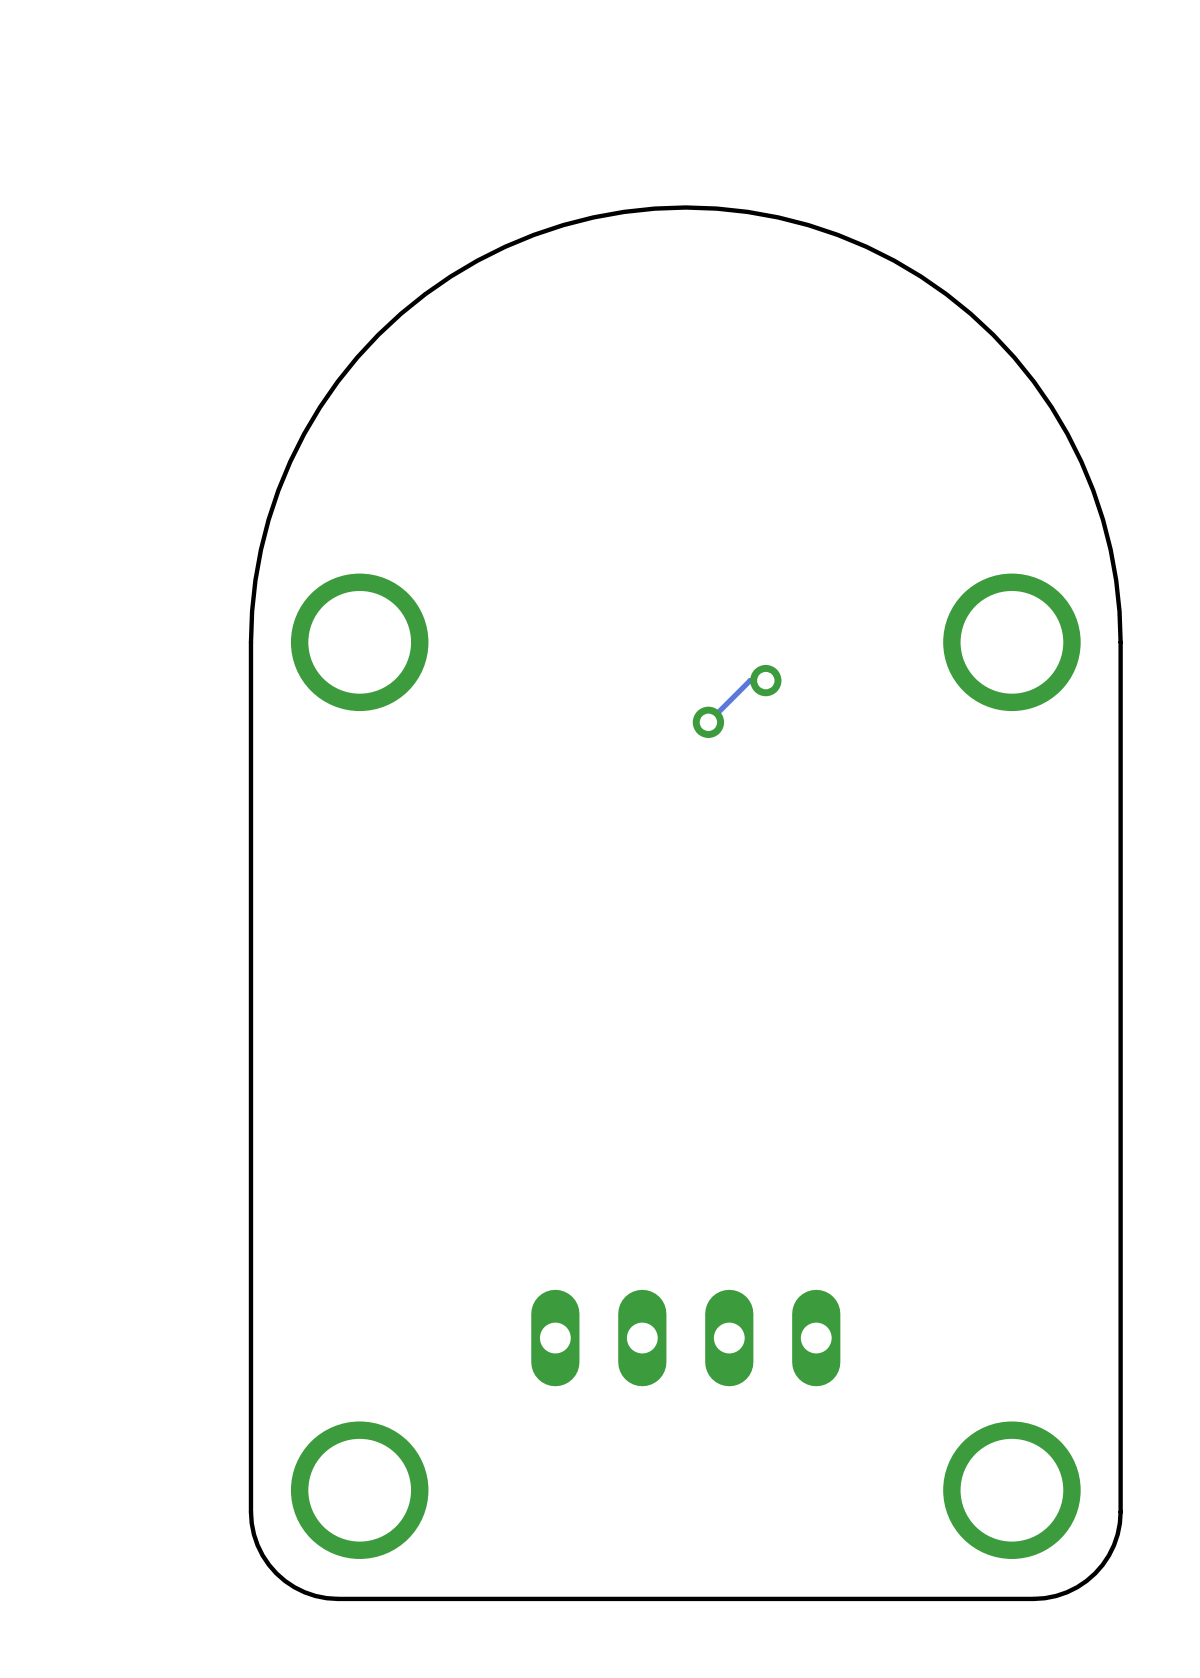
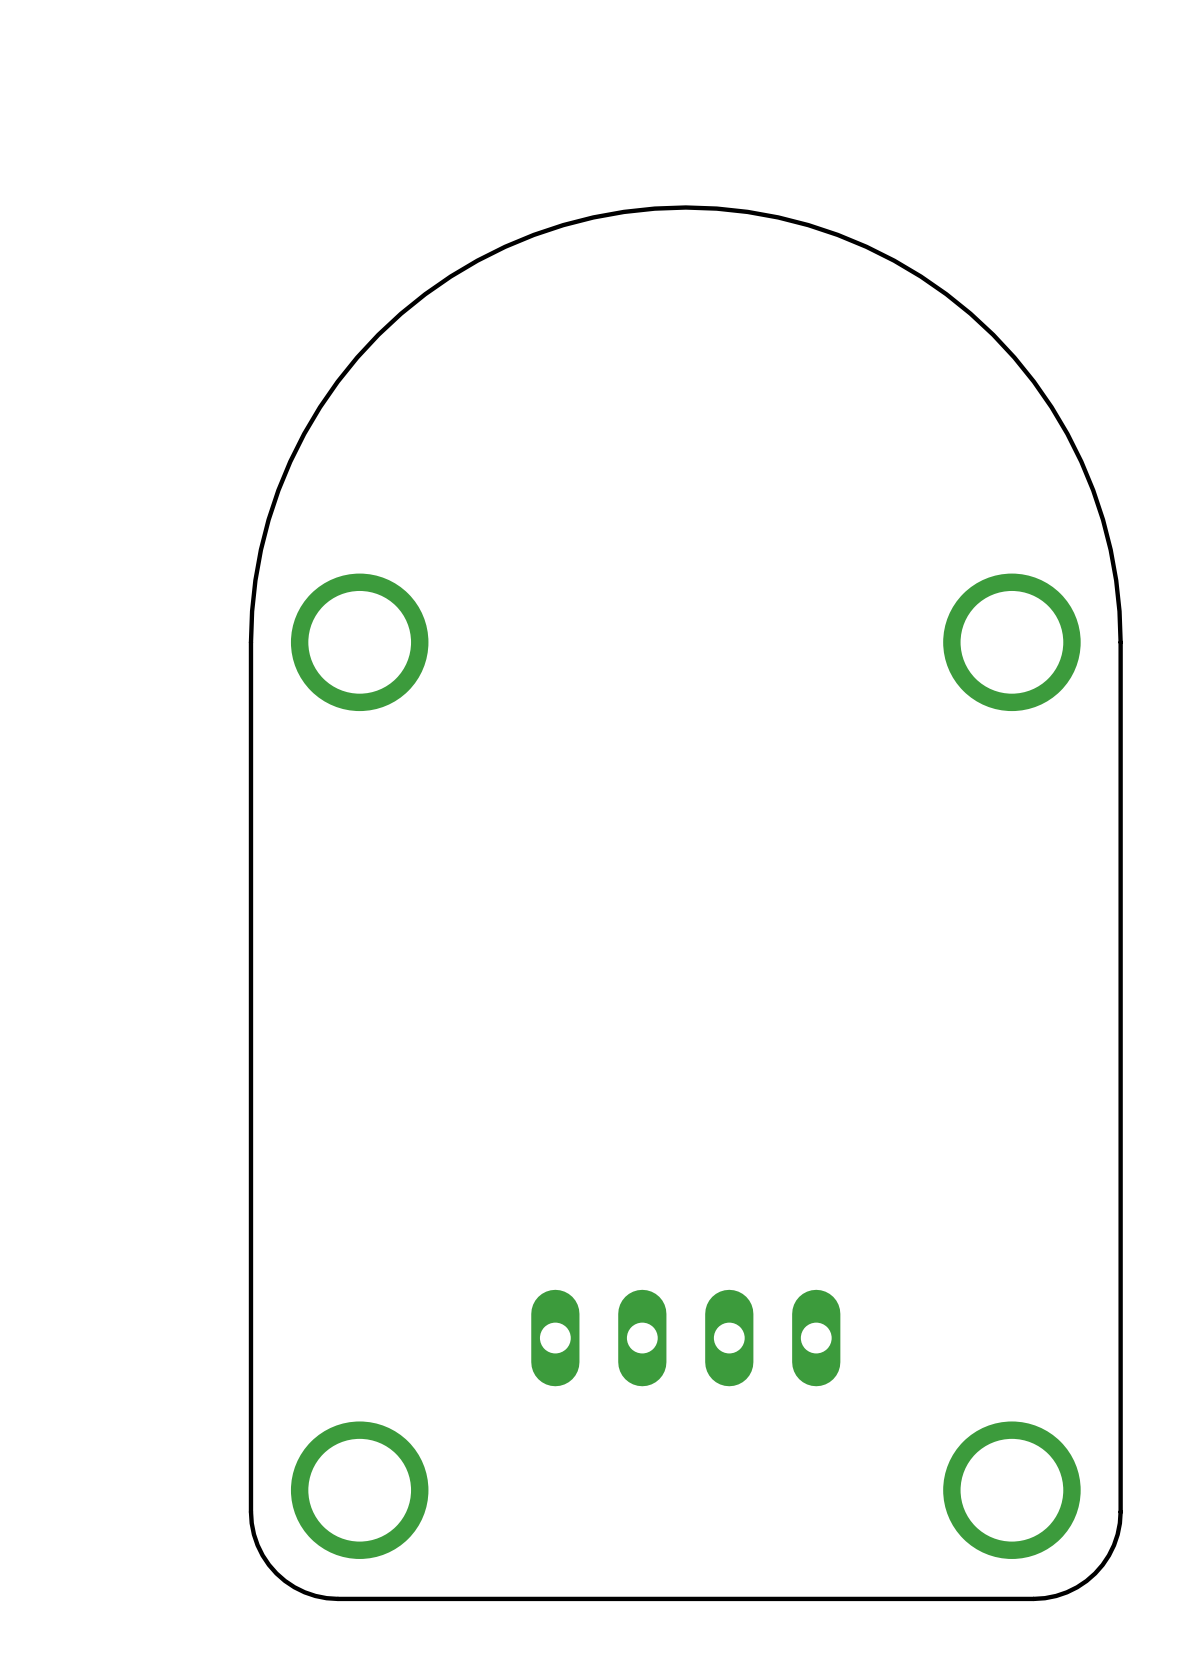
track: (765, 680) (750, 680) (708, 722) -> none
via: (765, 680) -> none
via: (708, 722) -> none

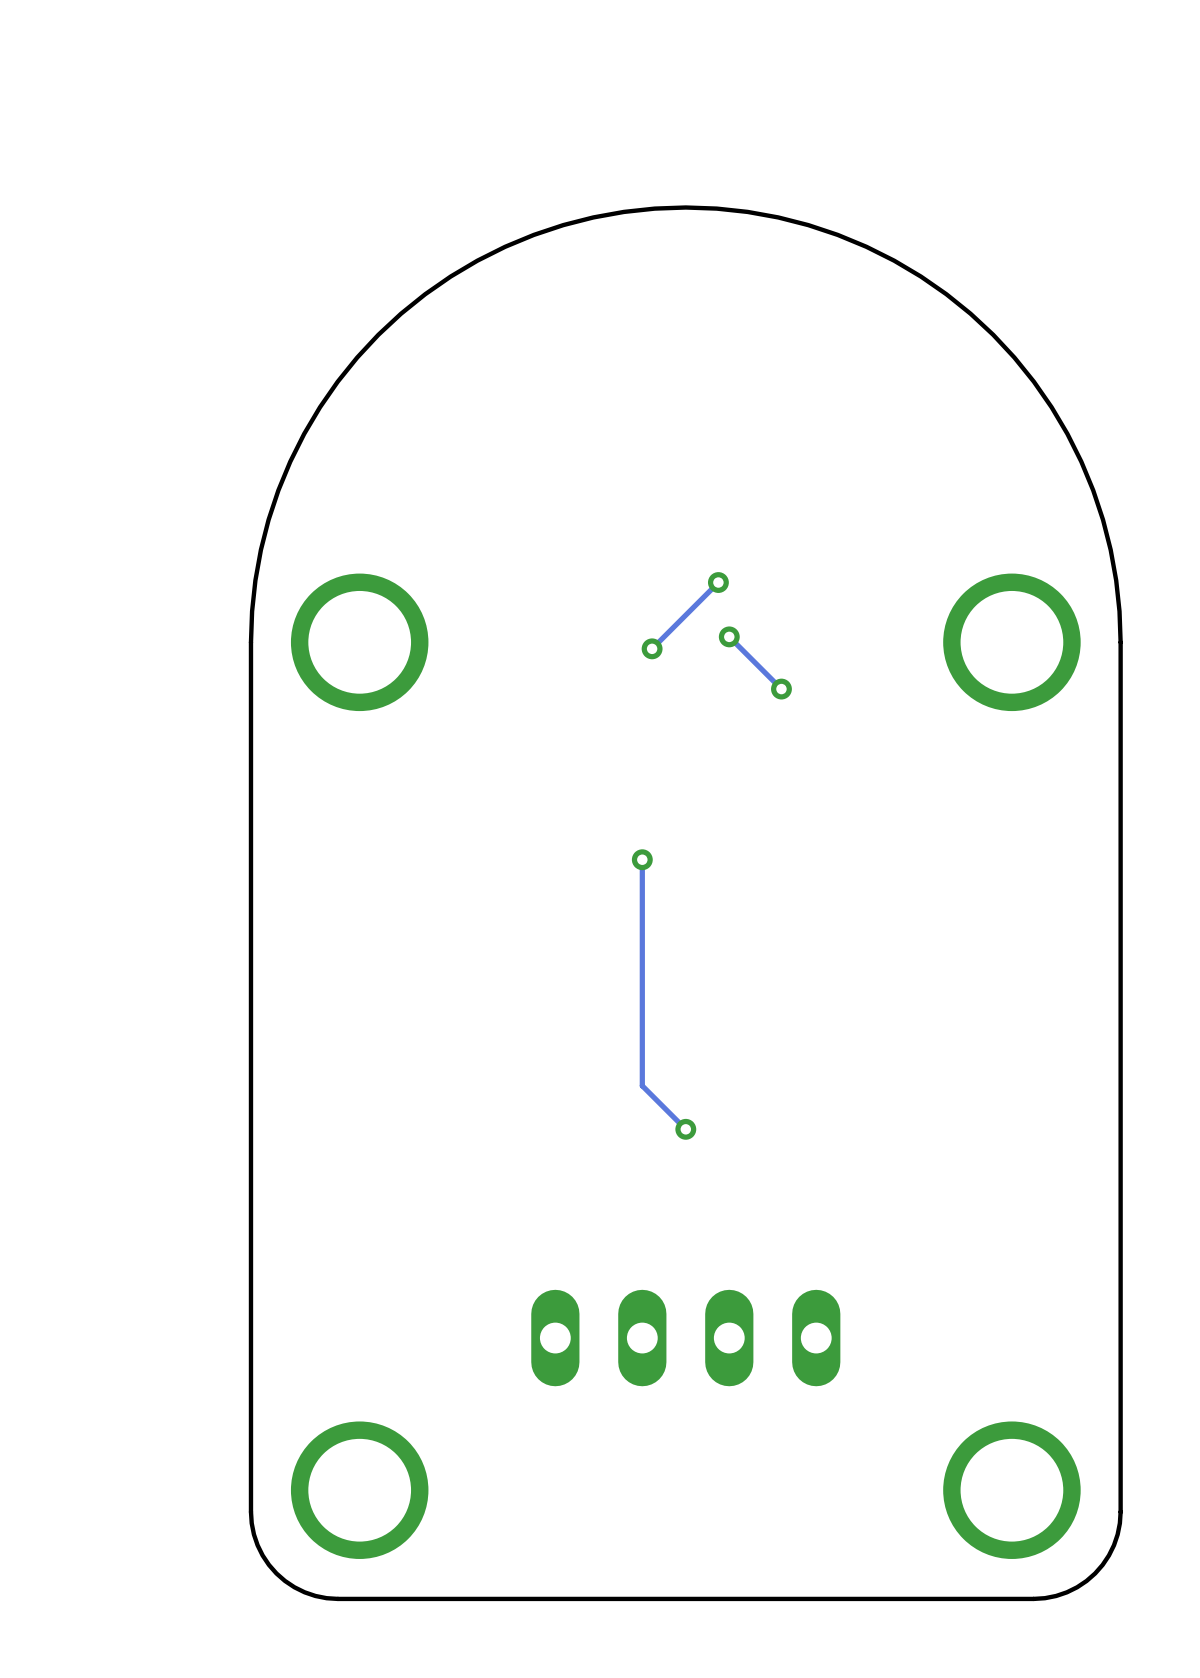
track: none -> (718, 582) (652, 648)
via: none -> (718, 582)
track: none -> (729, 636) (781, 689)
via: none -> (729, 636)
via: none -> (652, 648)
via: none -> (781, 689)
track: none -> (642, 859) (642, 1085) (685, 1129)
via: none -> (642, 859)
via: none -> (685, 1129)

